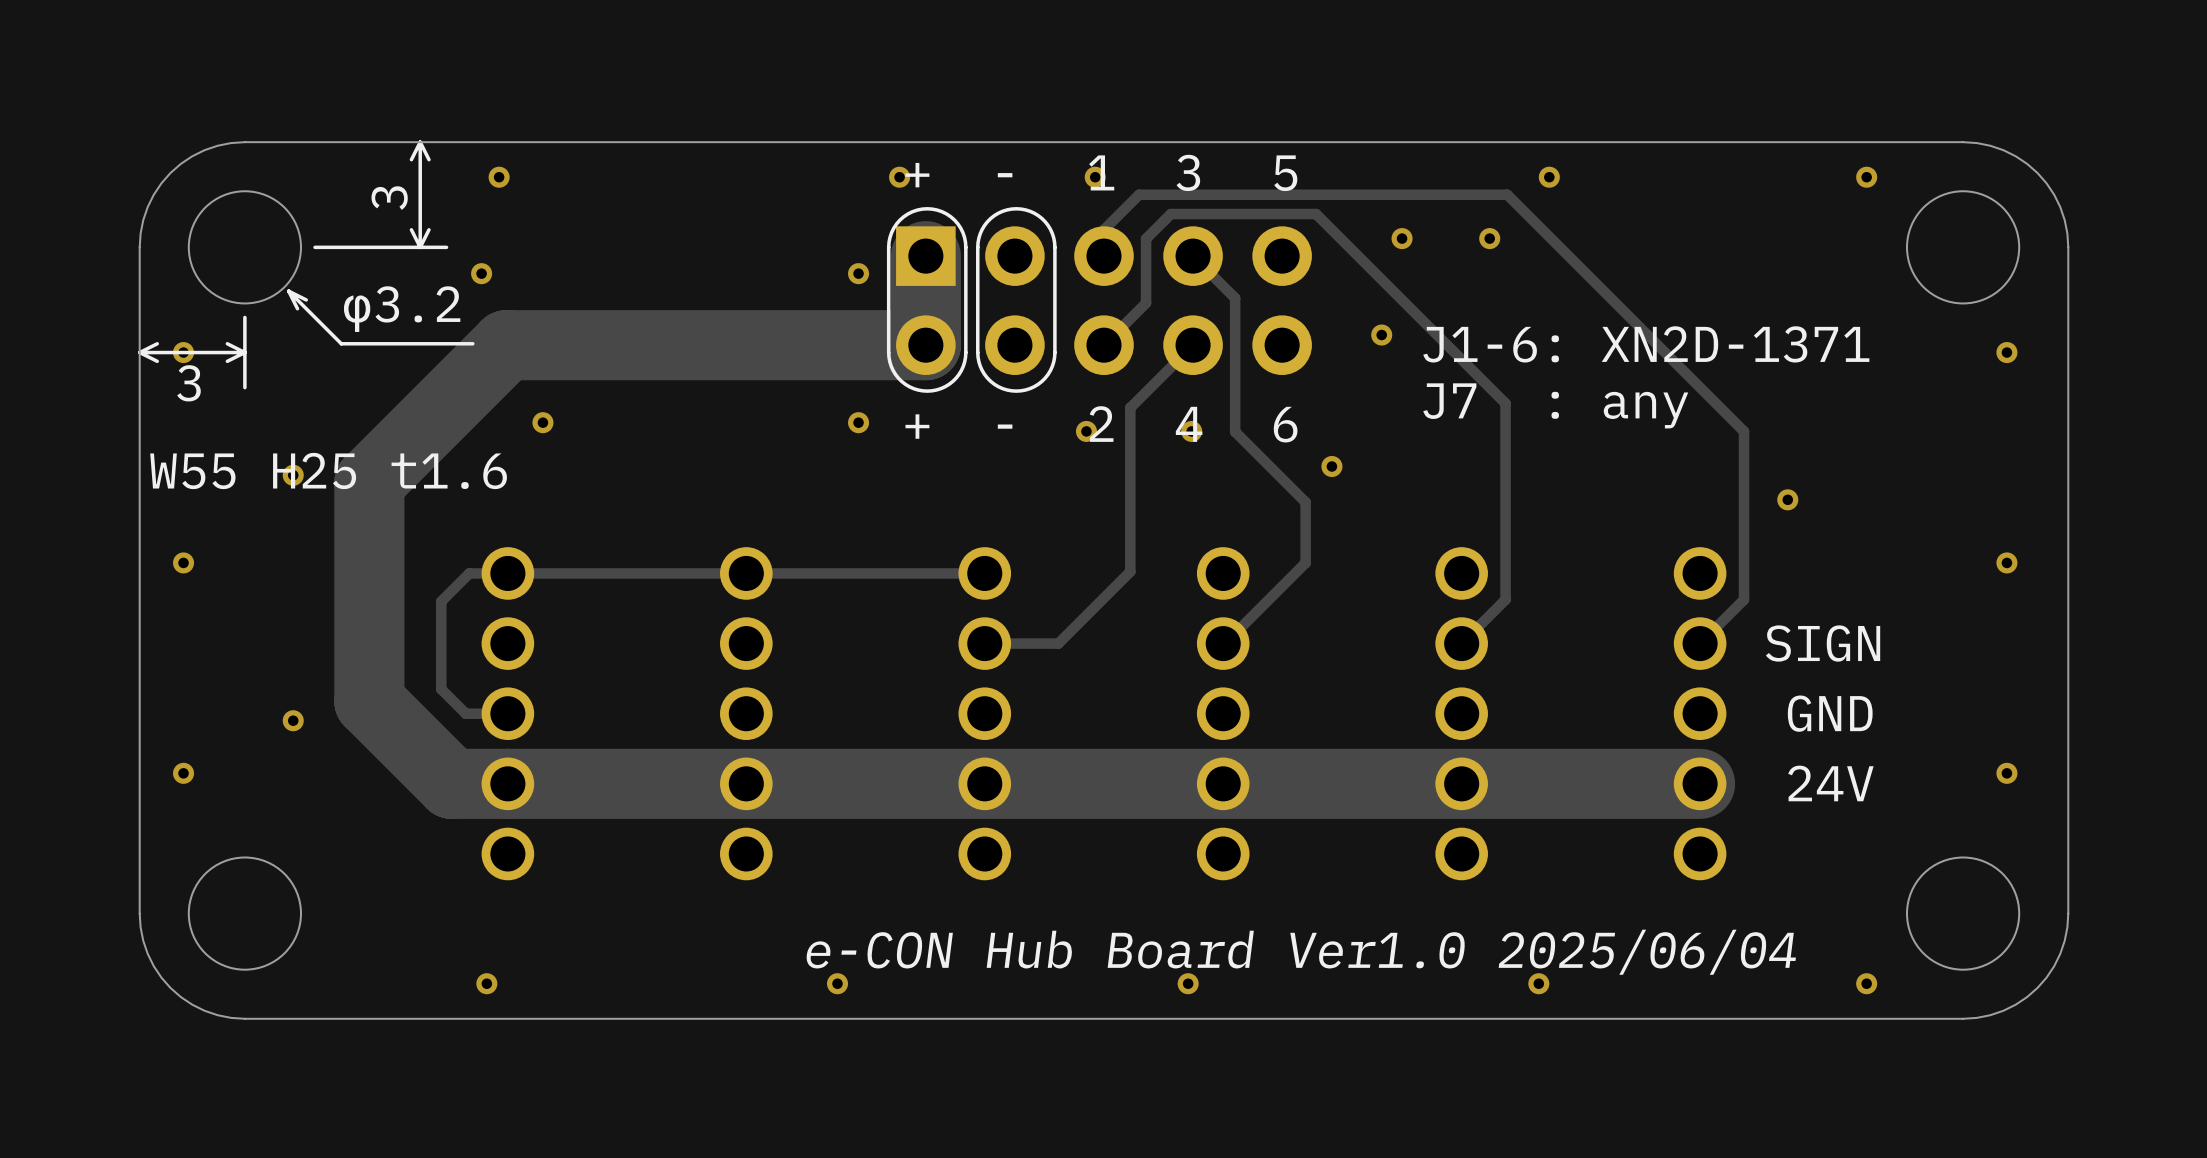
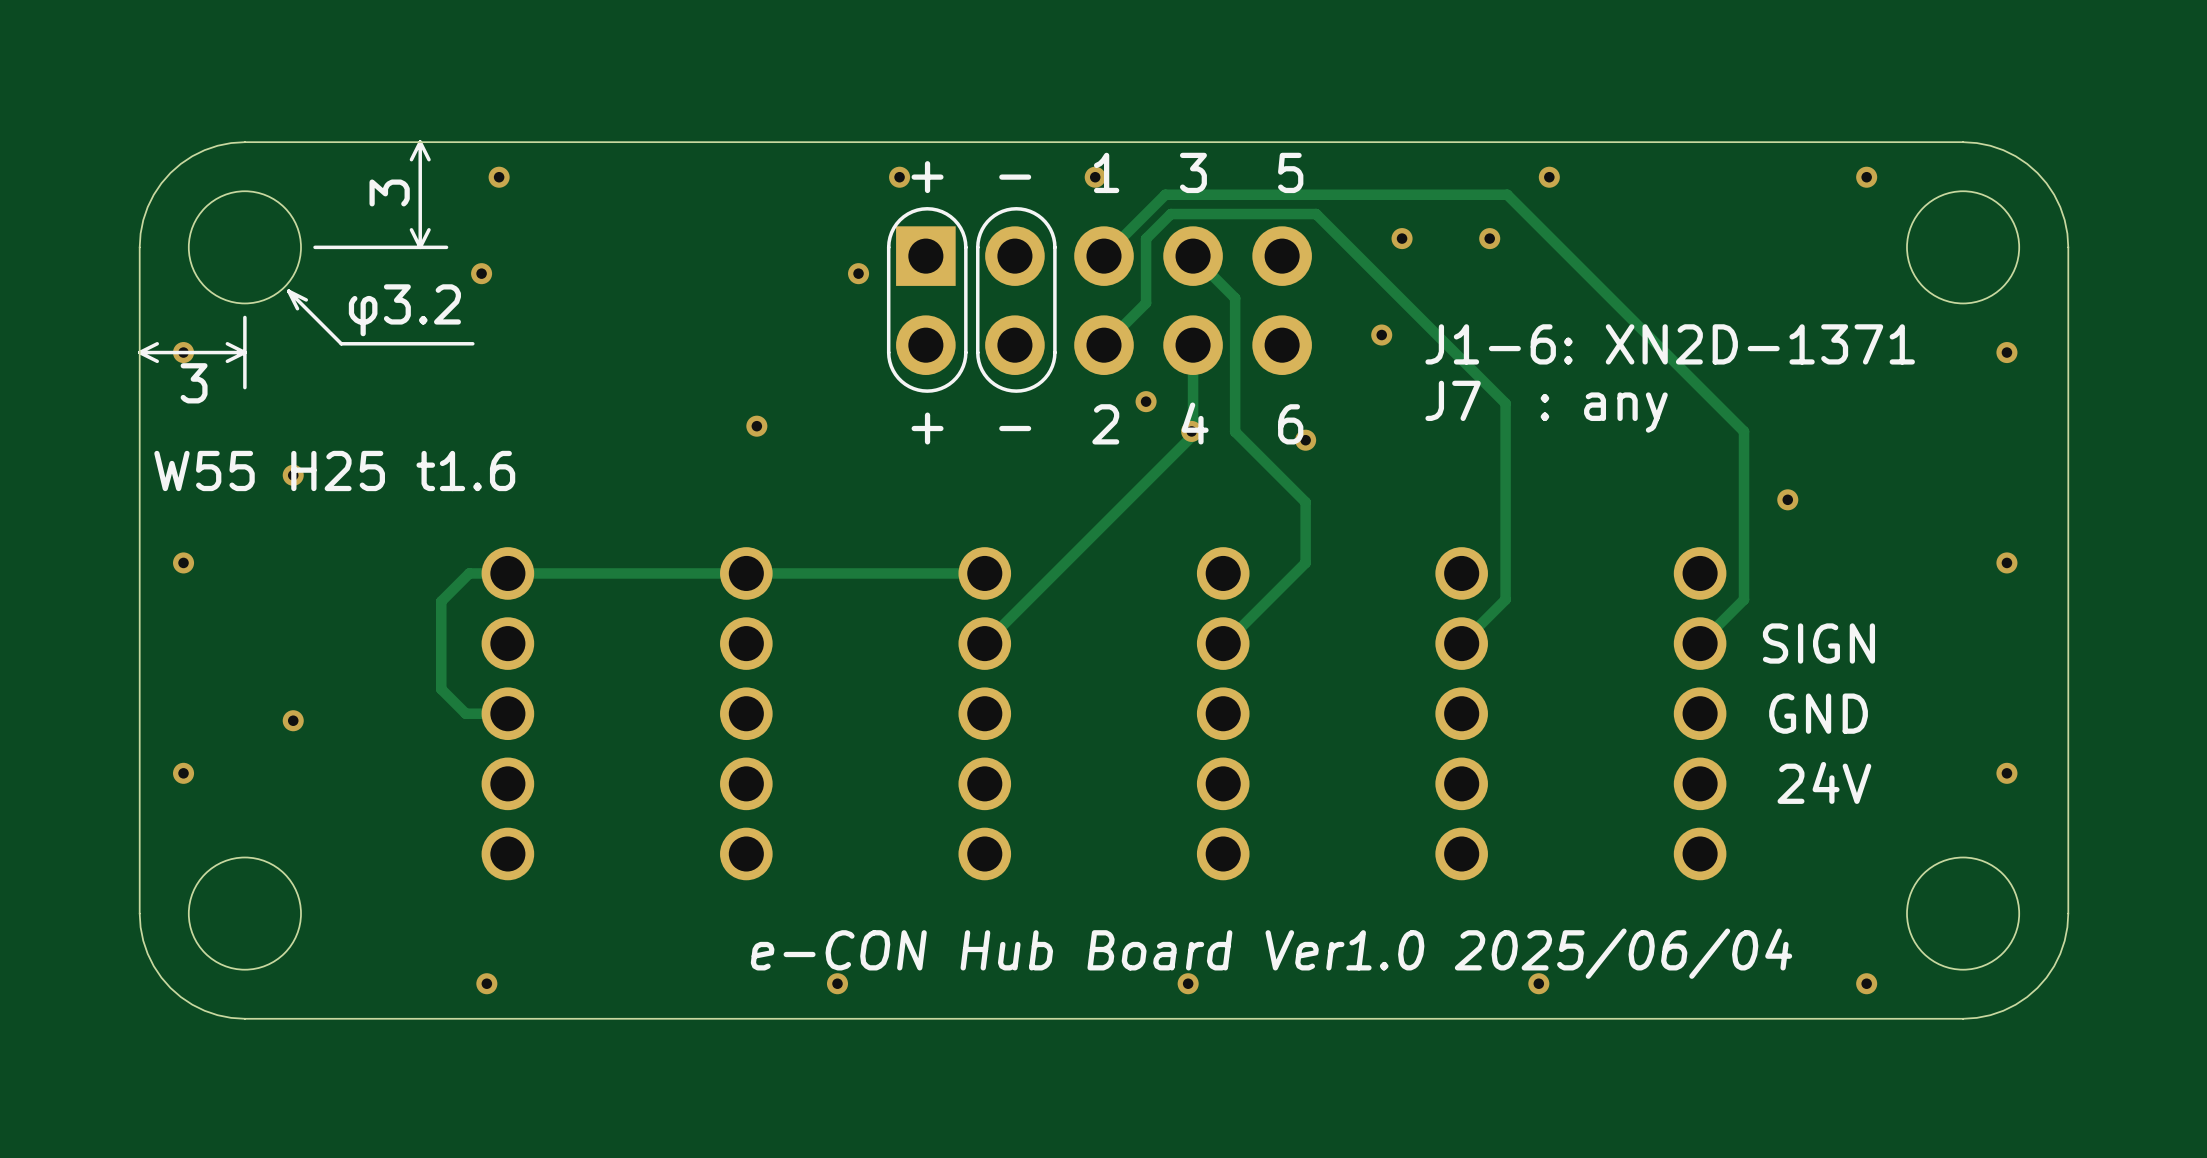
track: (1165, 194) (1139, 194) (1104, 229) (1104, 256) -> (1165, 194) (1104, 256)
track: (925, 256) (925, 345) (506, 345) (369, 482) (369, 701) (451, 783) (1700, 783) -> none
track: (1193, 345) (1130, 407) (1130, 571) (1058, 643) (984, 643) -> (1193, 345) (1193, 435) (984, 643)
via: (542, 422) -> none
via position: (858, 422) -> (756, 426)
via position: (1086, 431) -> (1146, 401)
via position: (1331, 466) -> (1305, 440)

